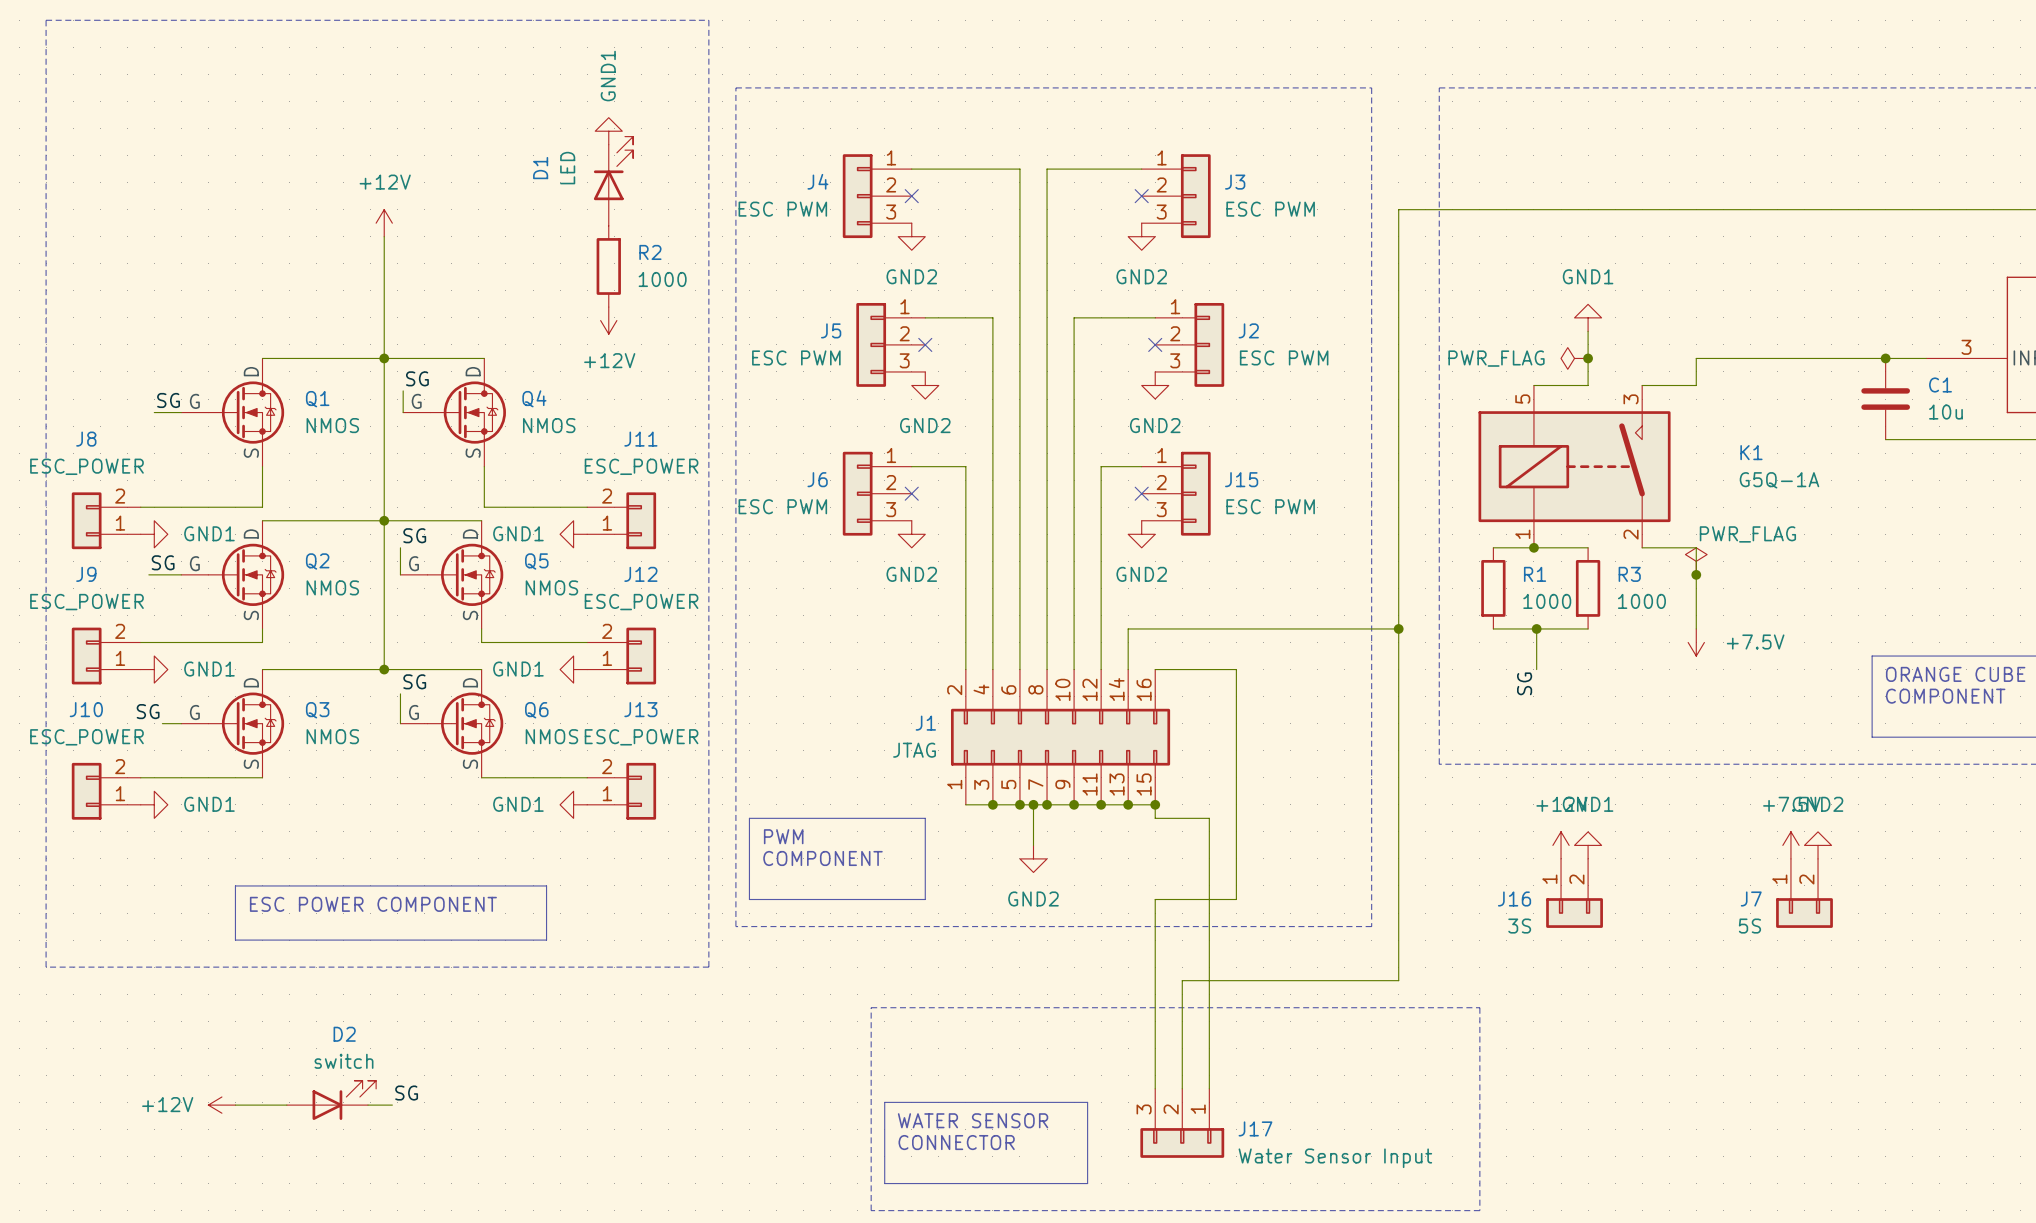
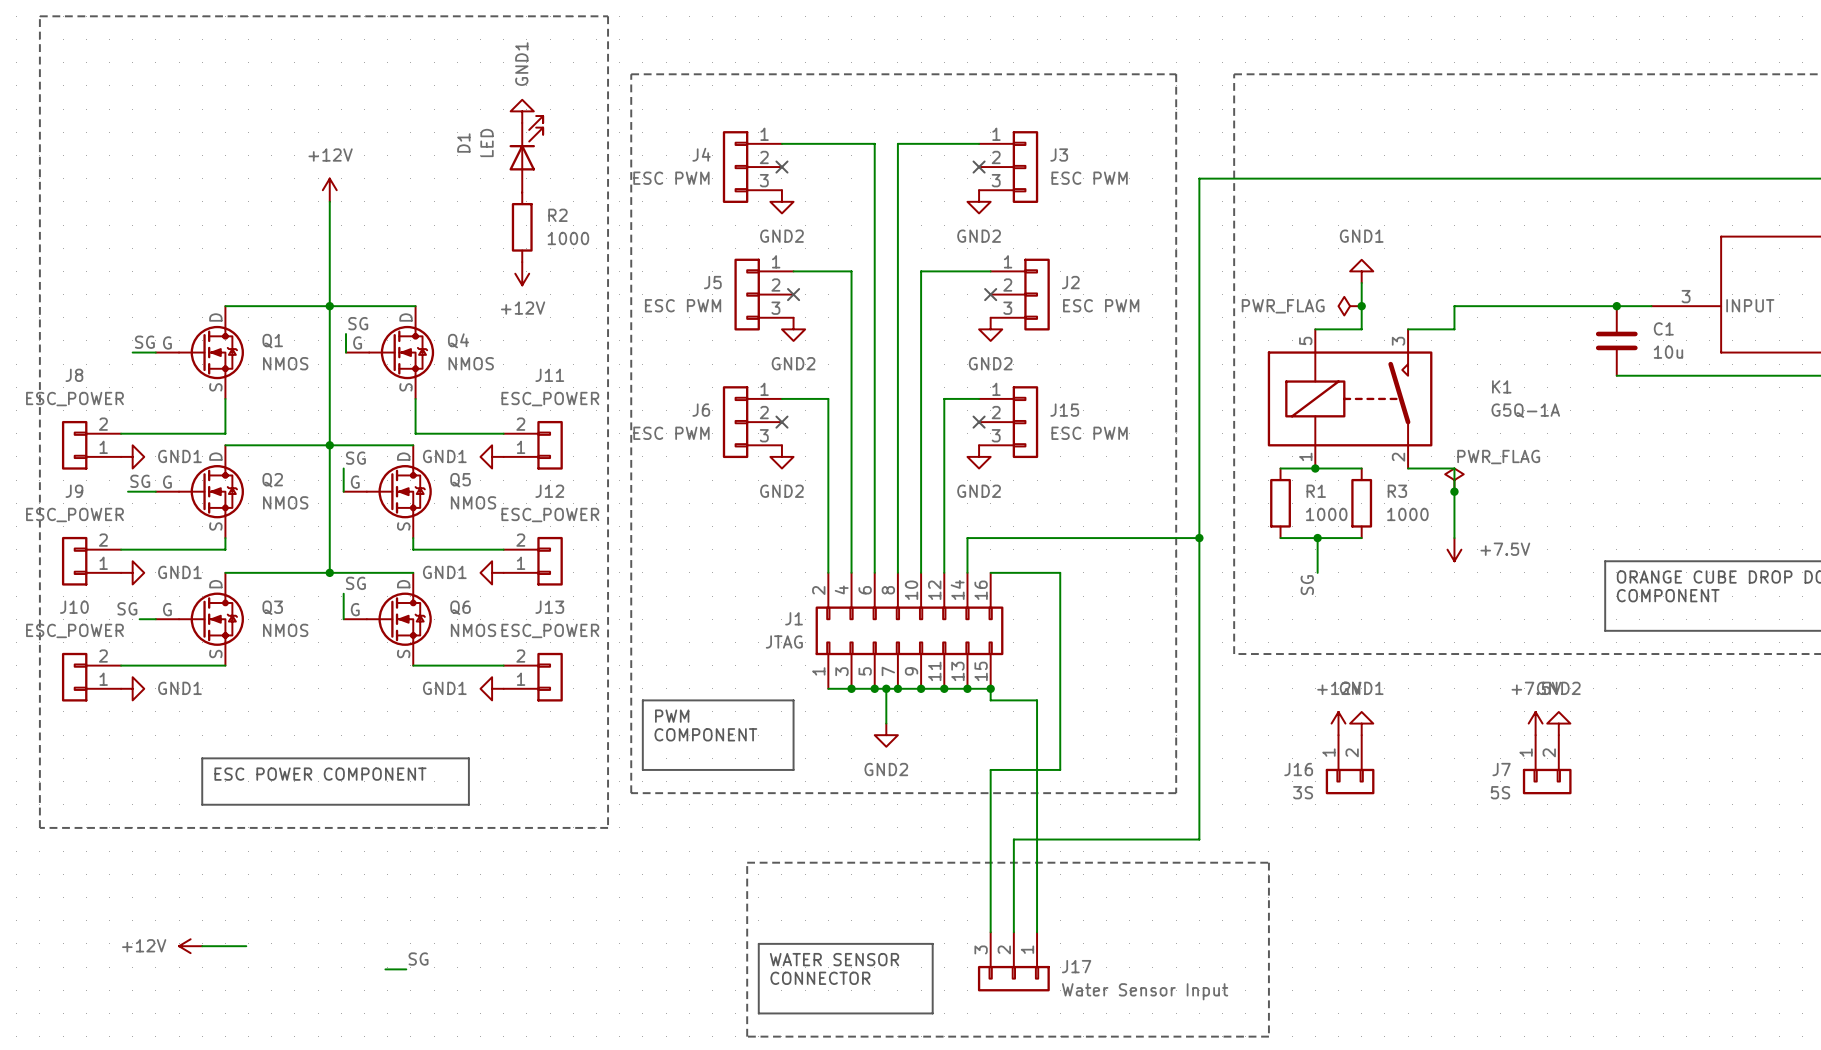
label position: SG (406, 1093) -> SG (418, 959)
D2: switch (331, 1100) -> none
wire: (368, 1105) (392, 1105) -> (385, 969) (406, 969)

